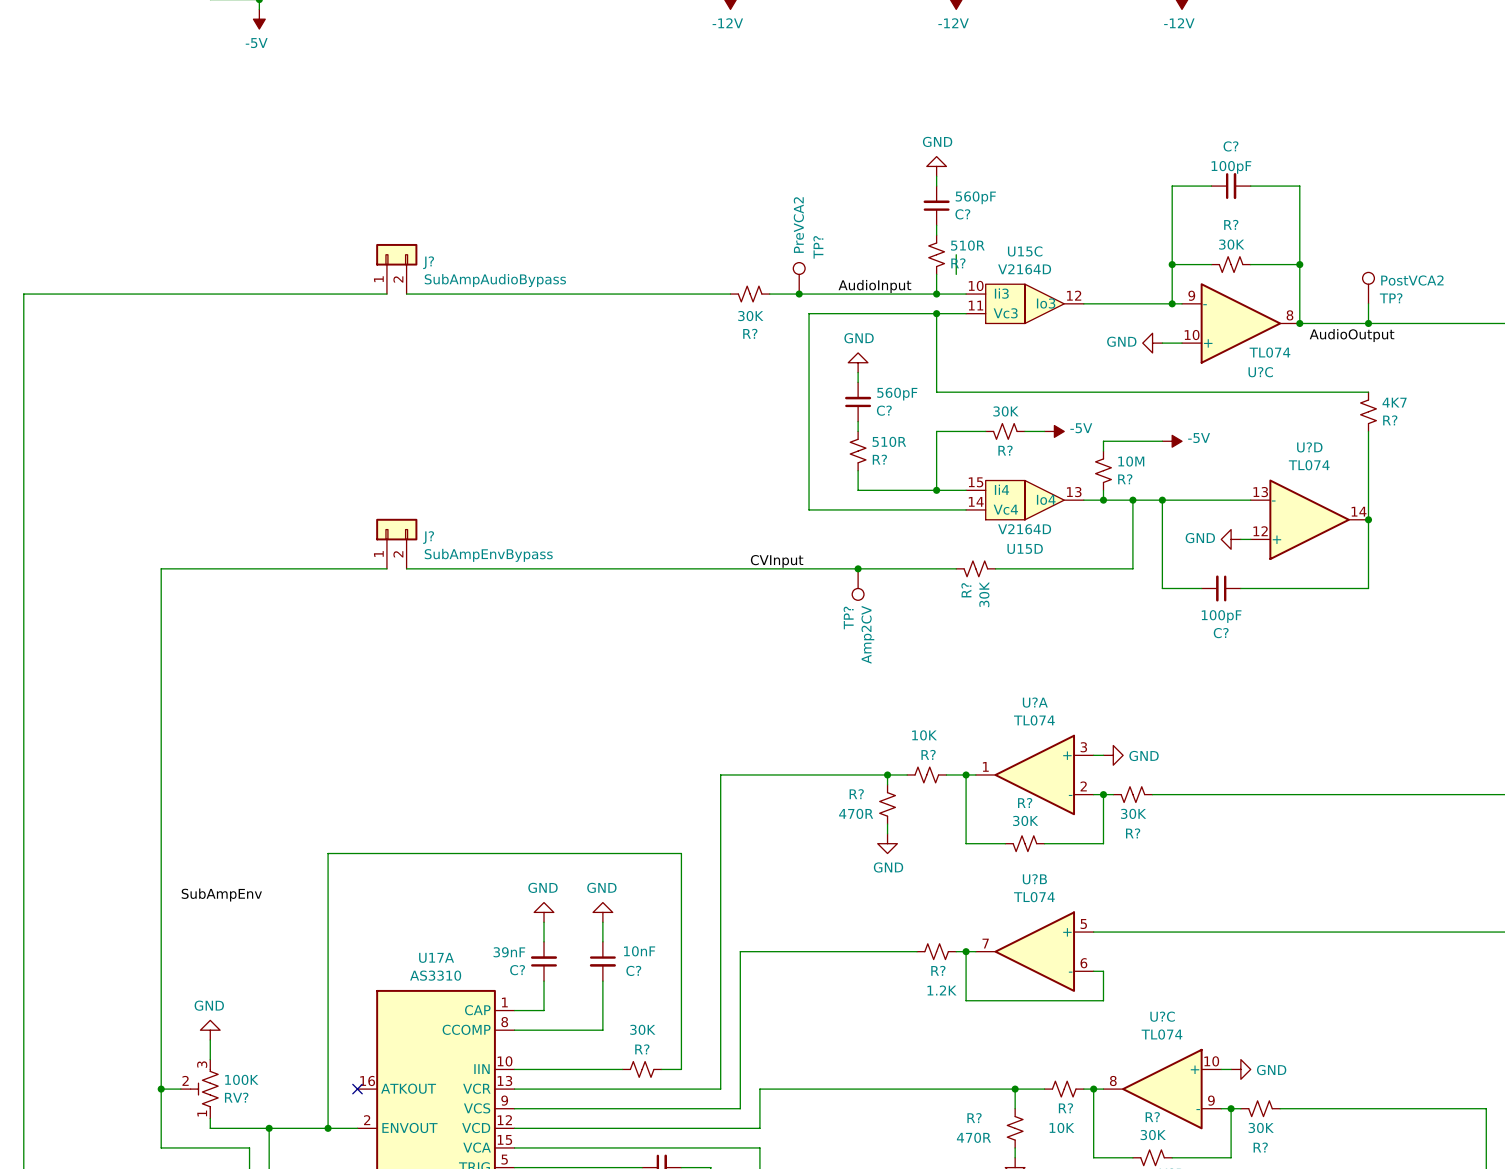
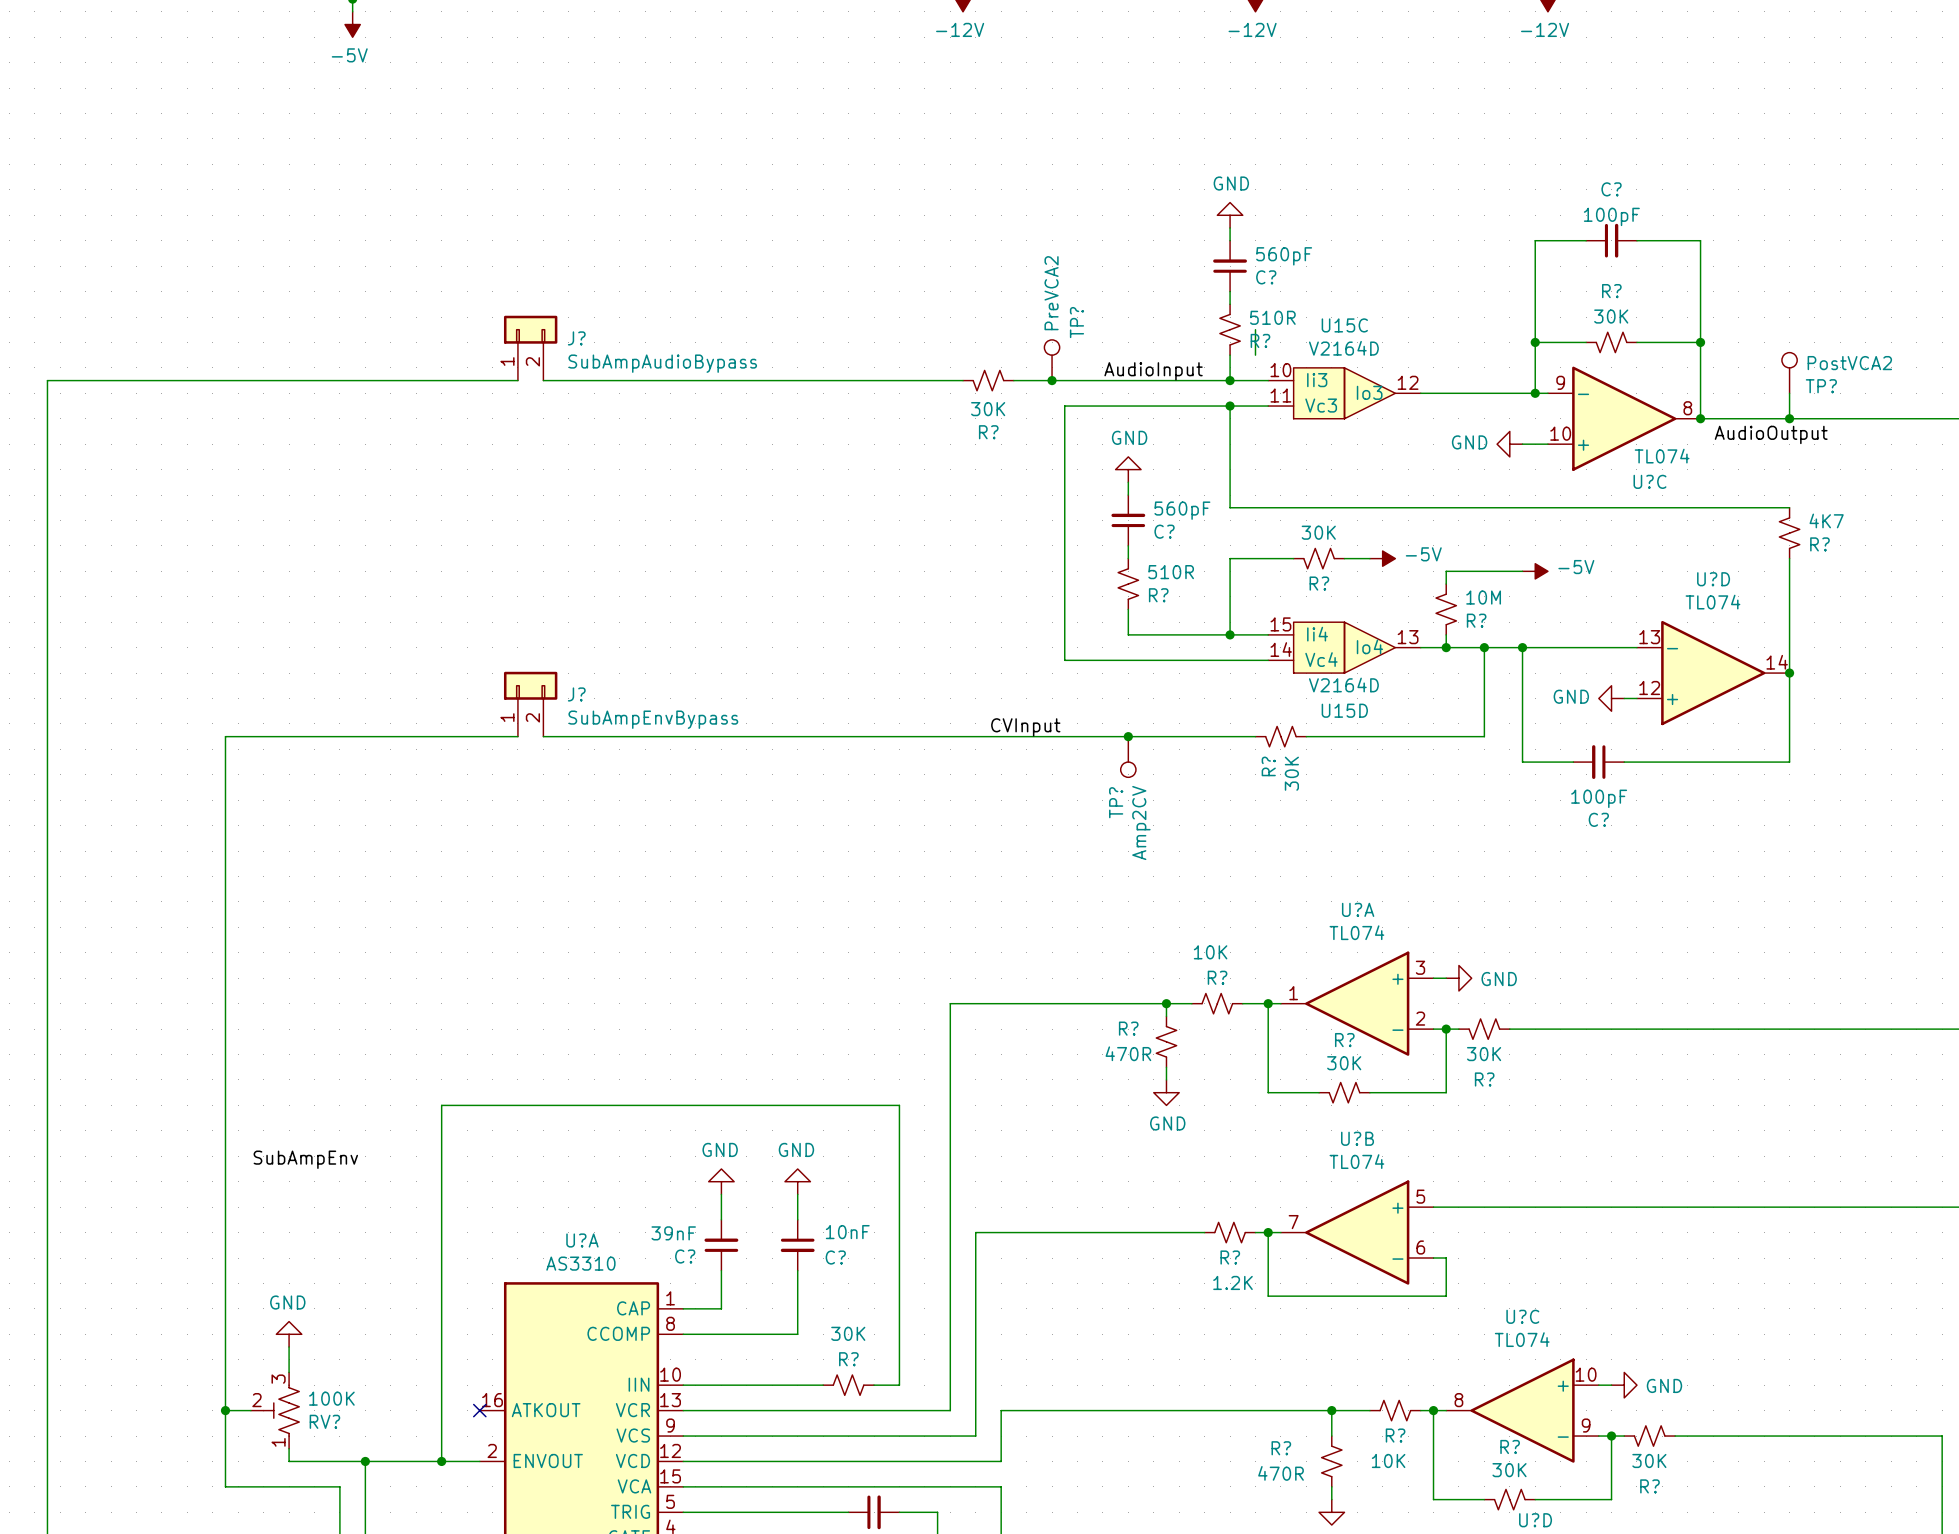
U17A name: U17A (436, 957) -> U?A (582, 1240)

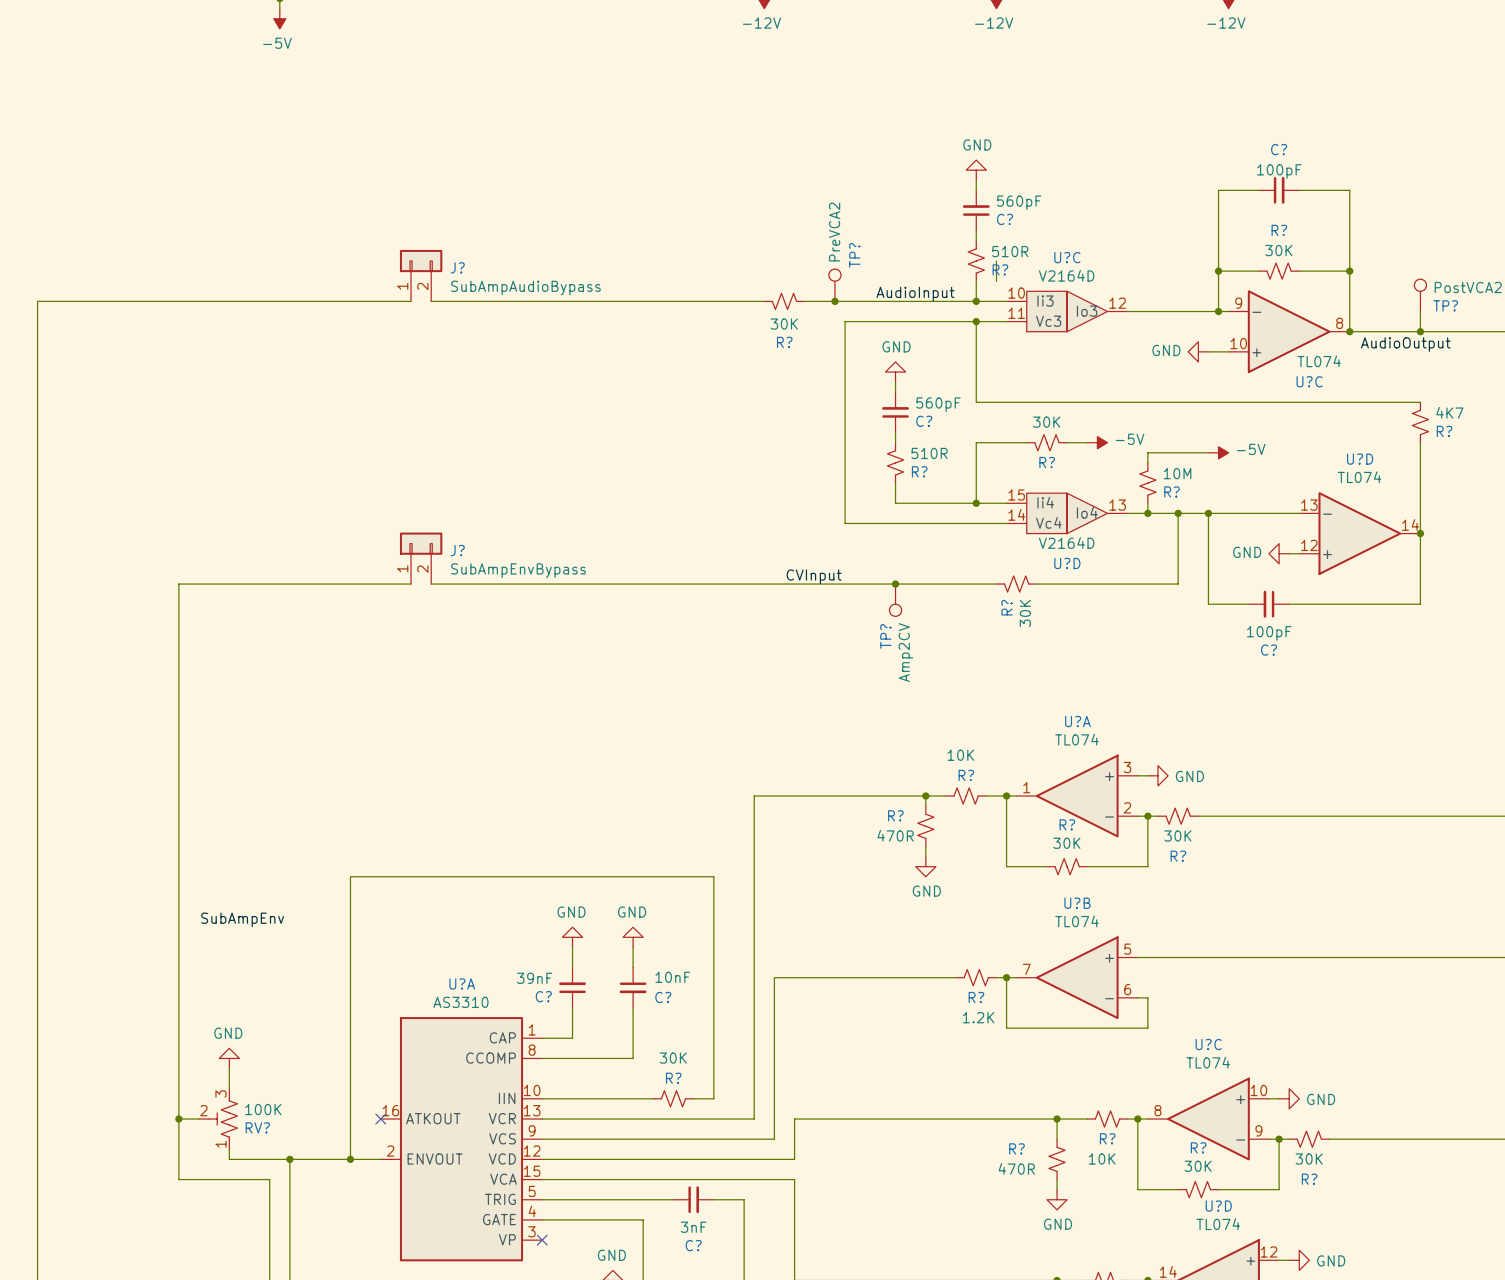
U15C name: U15C (1344, 325) -> U?C (1067, 257)
U15D name: U15D (1344, 710) -> U?D (1067, 563)

